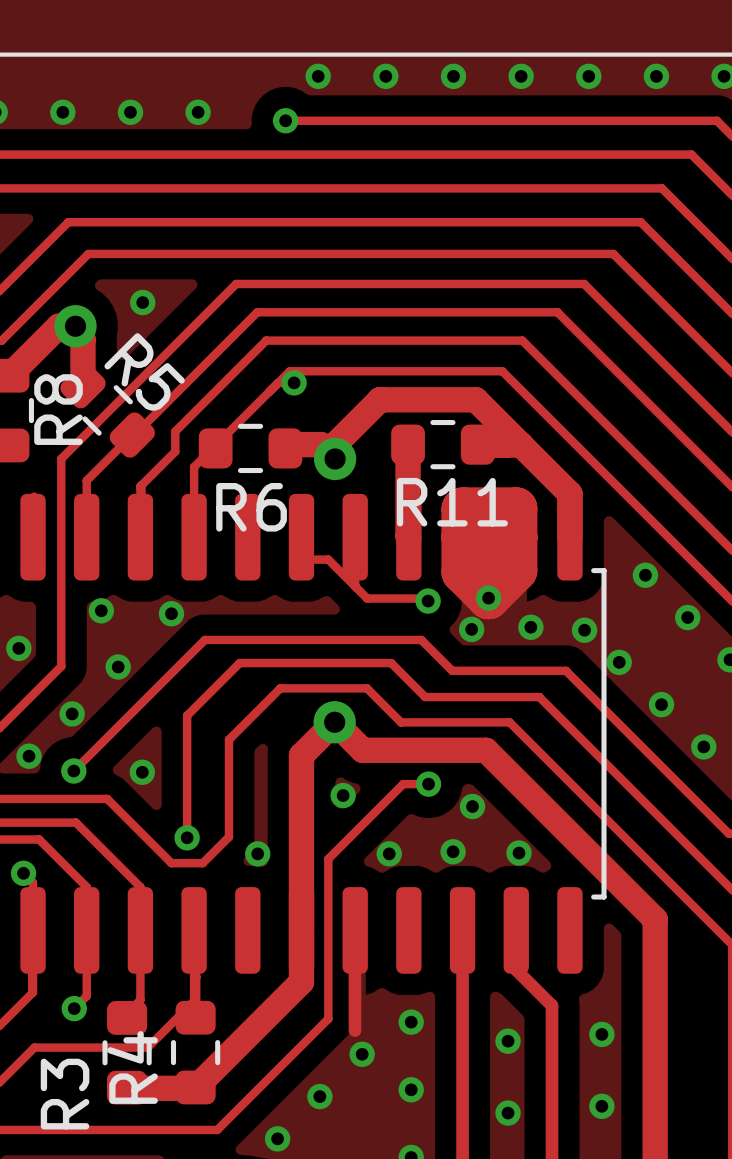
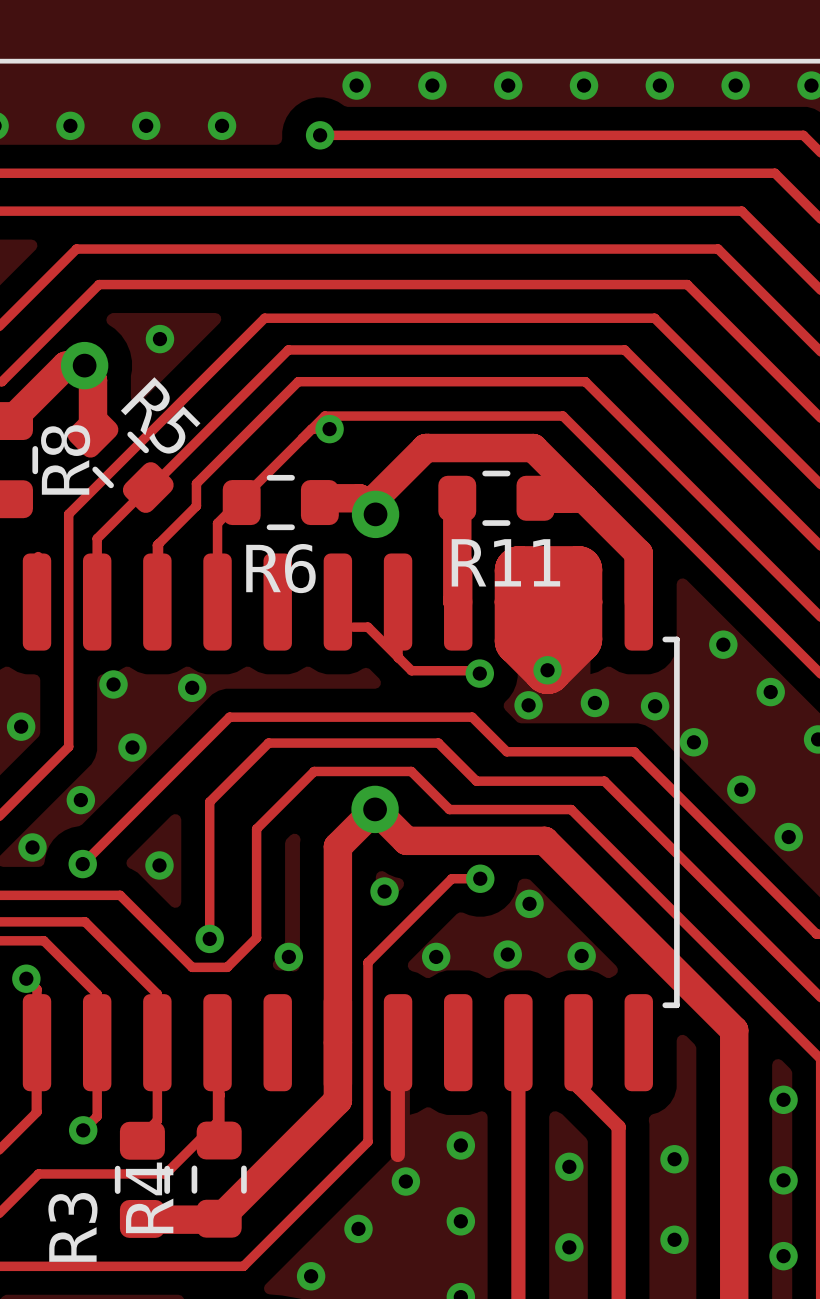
via: none -> (783, 1099)
via: none -> (783, 1180)
via: none -> (783, 1256)

